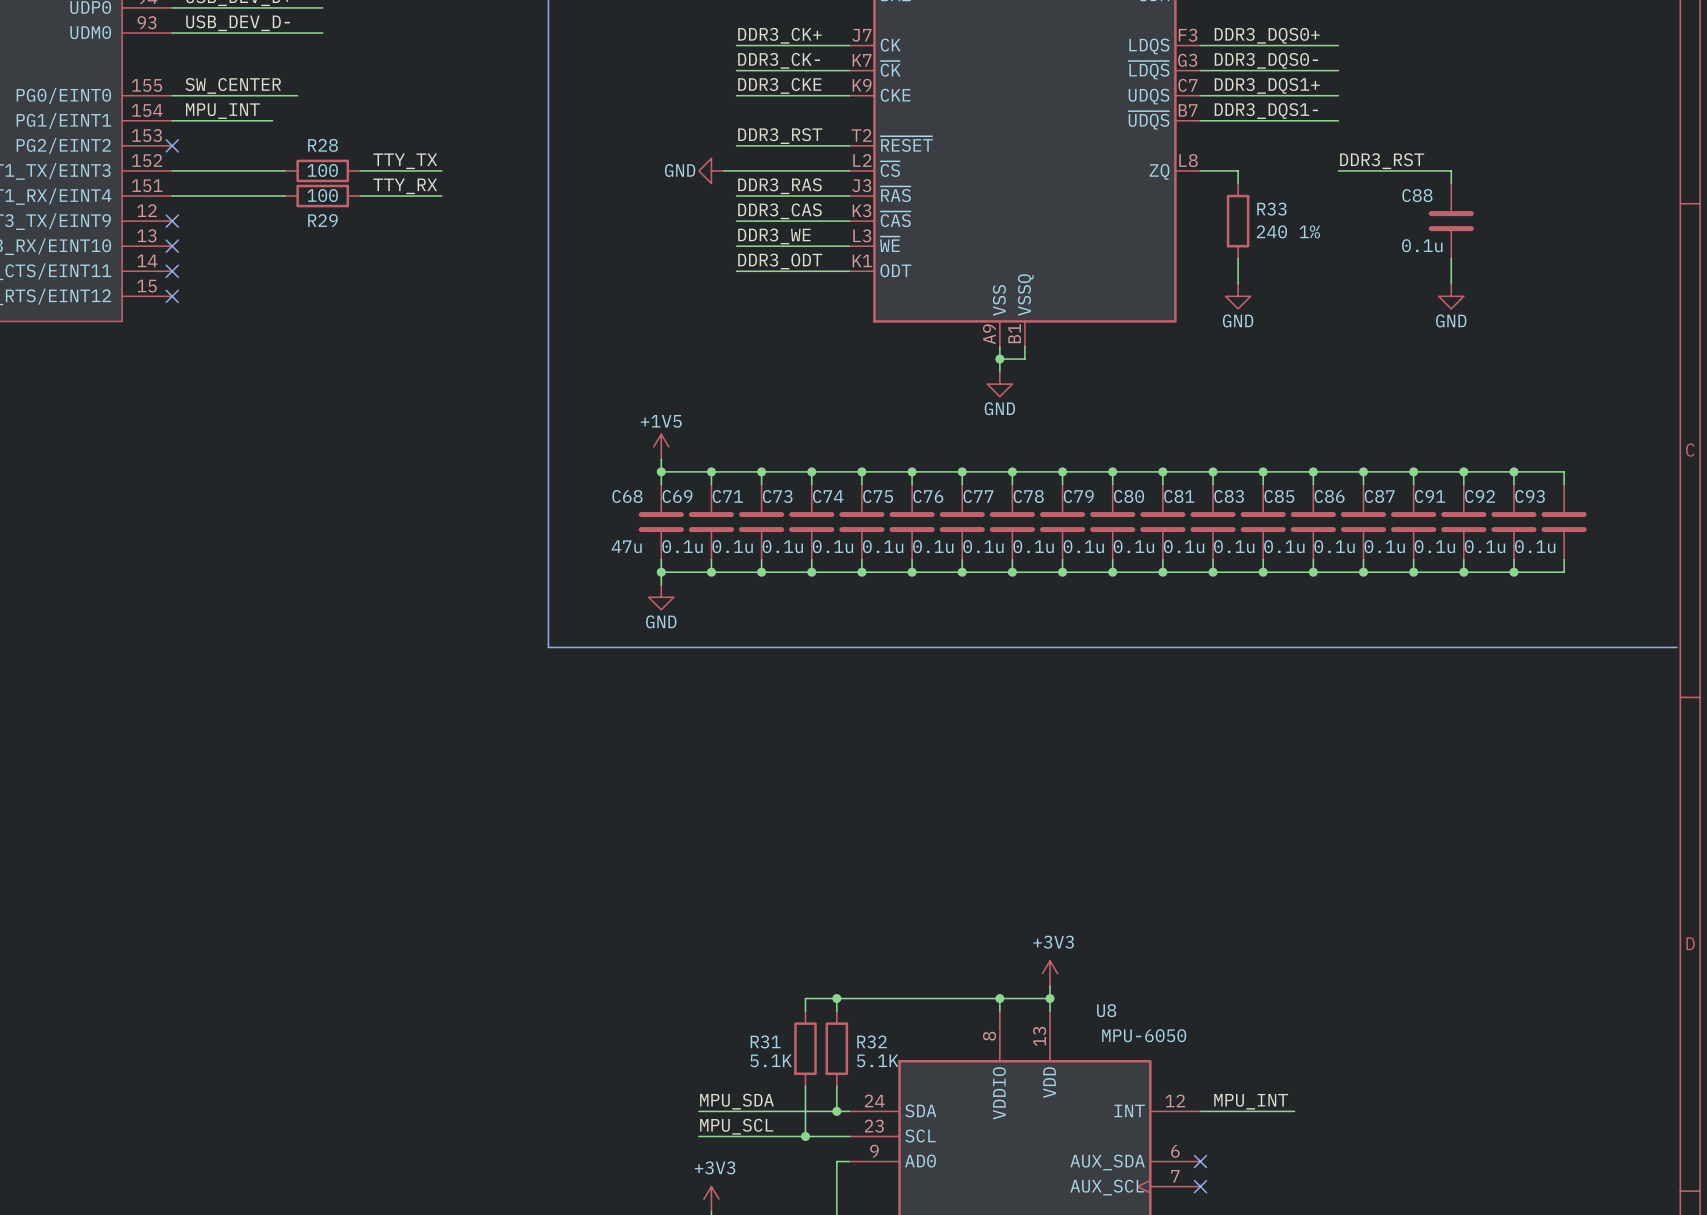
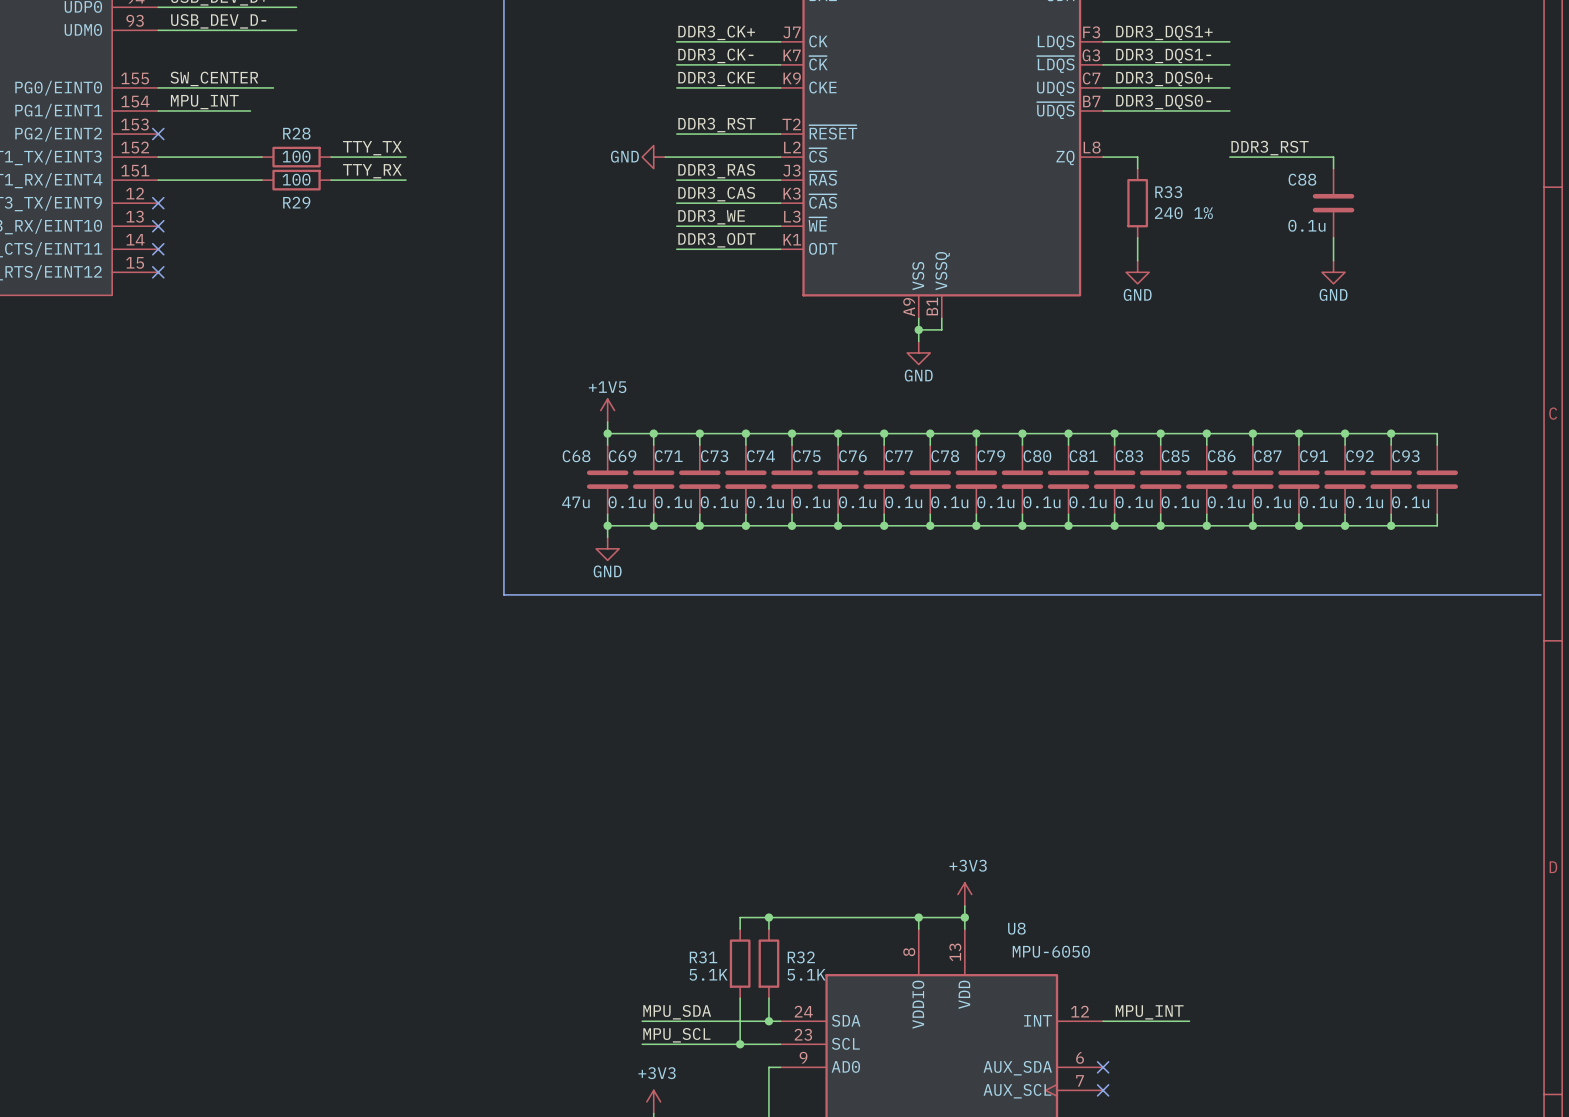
label: DDR3_DQS0+ (1267, 35) -> DDR3_DQS1+ (1164, 32)
label: DDR3_DQS0- (1266, 60) -> DDR3_DQS1- (1163, 55)
label: DDR3_DQS1+ (1267, 85) -> DDR3_DQS0+ (1164, 78)
label: DDR3_DQS1- (1266, 111) -> DDR3_DQS0- (1163, 102)

